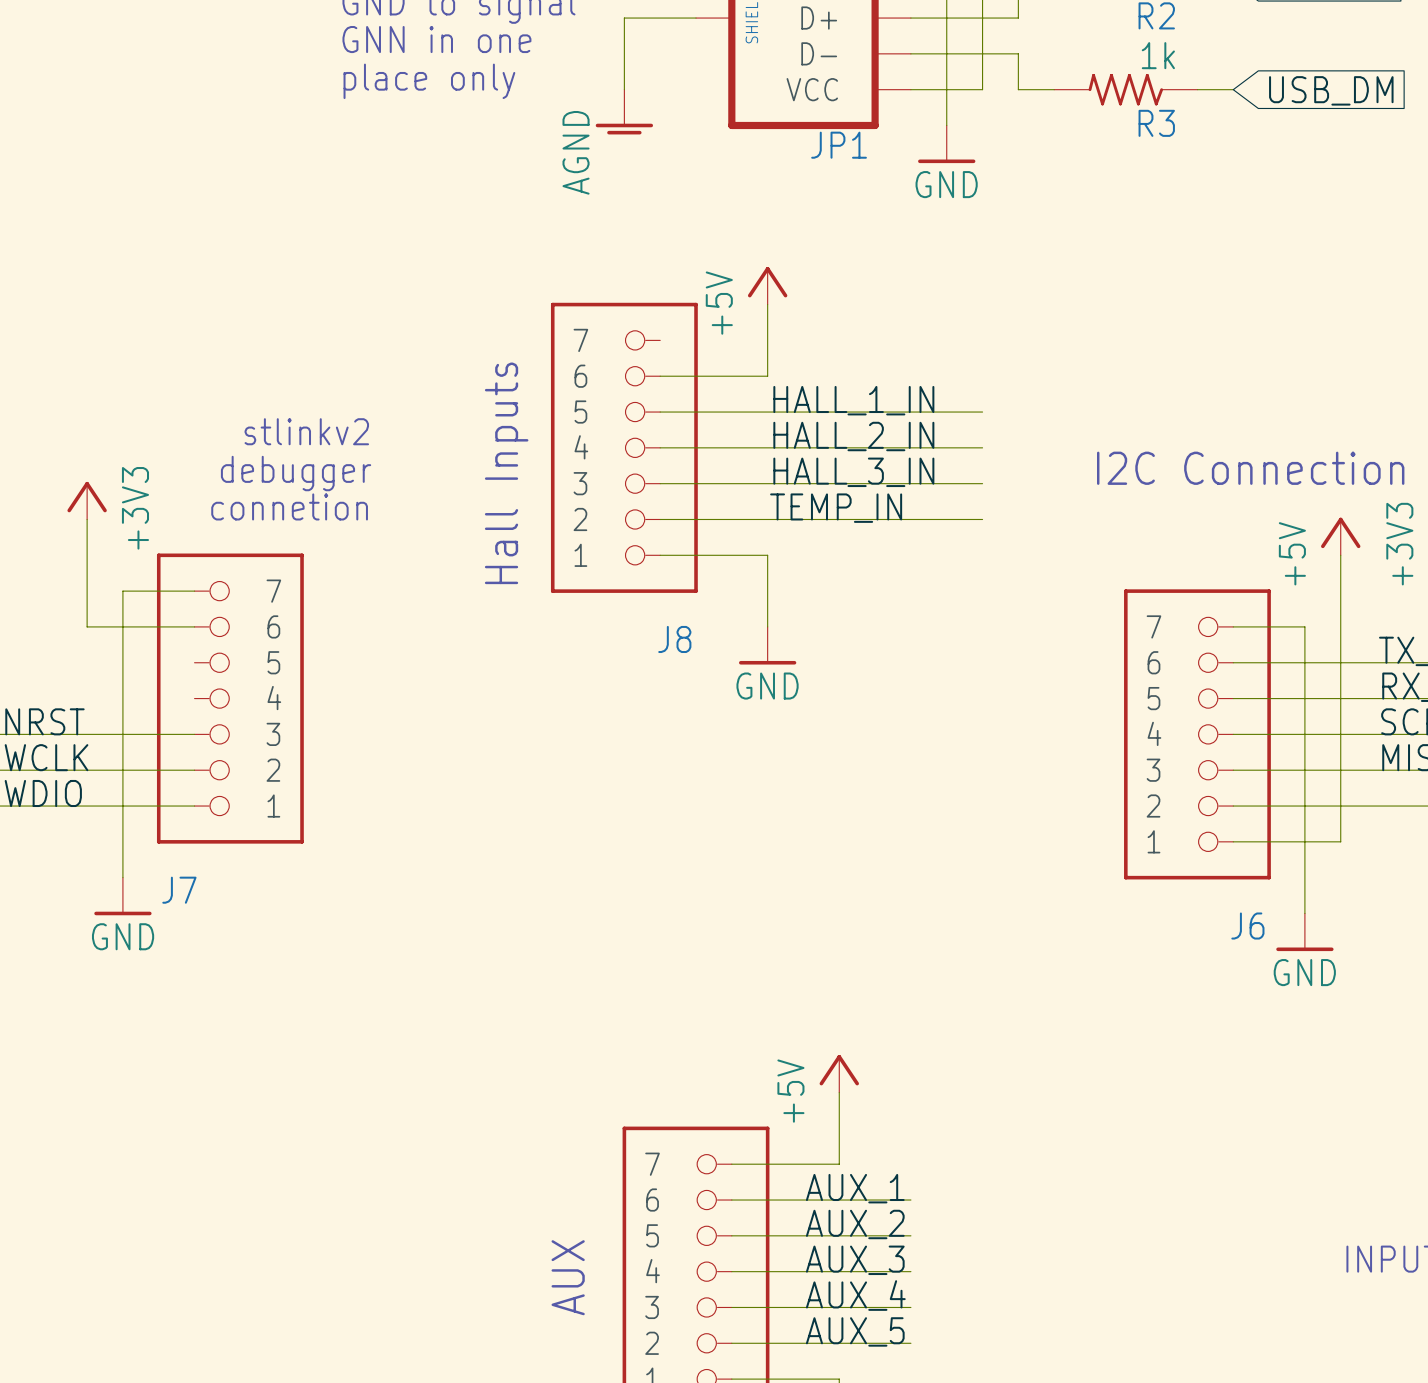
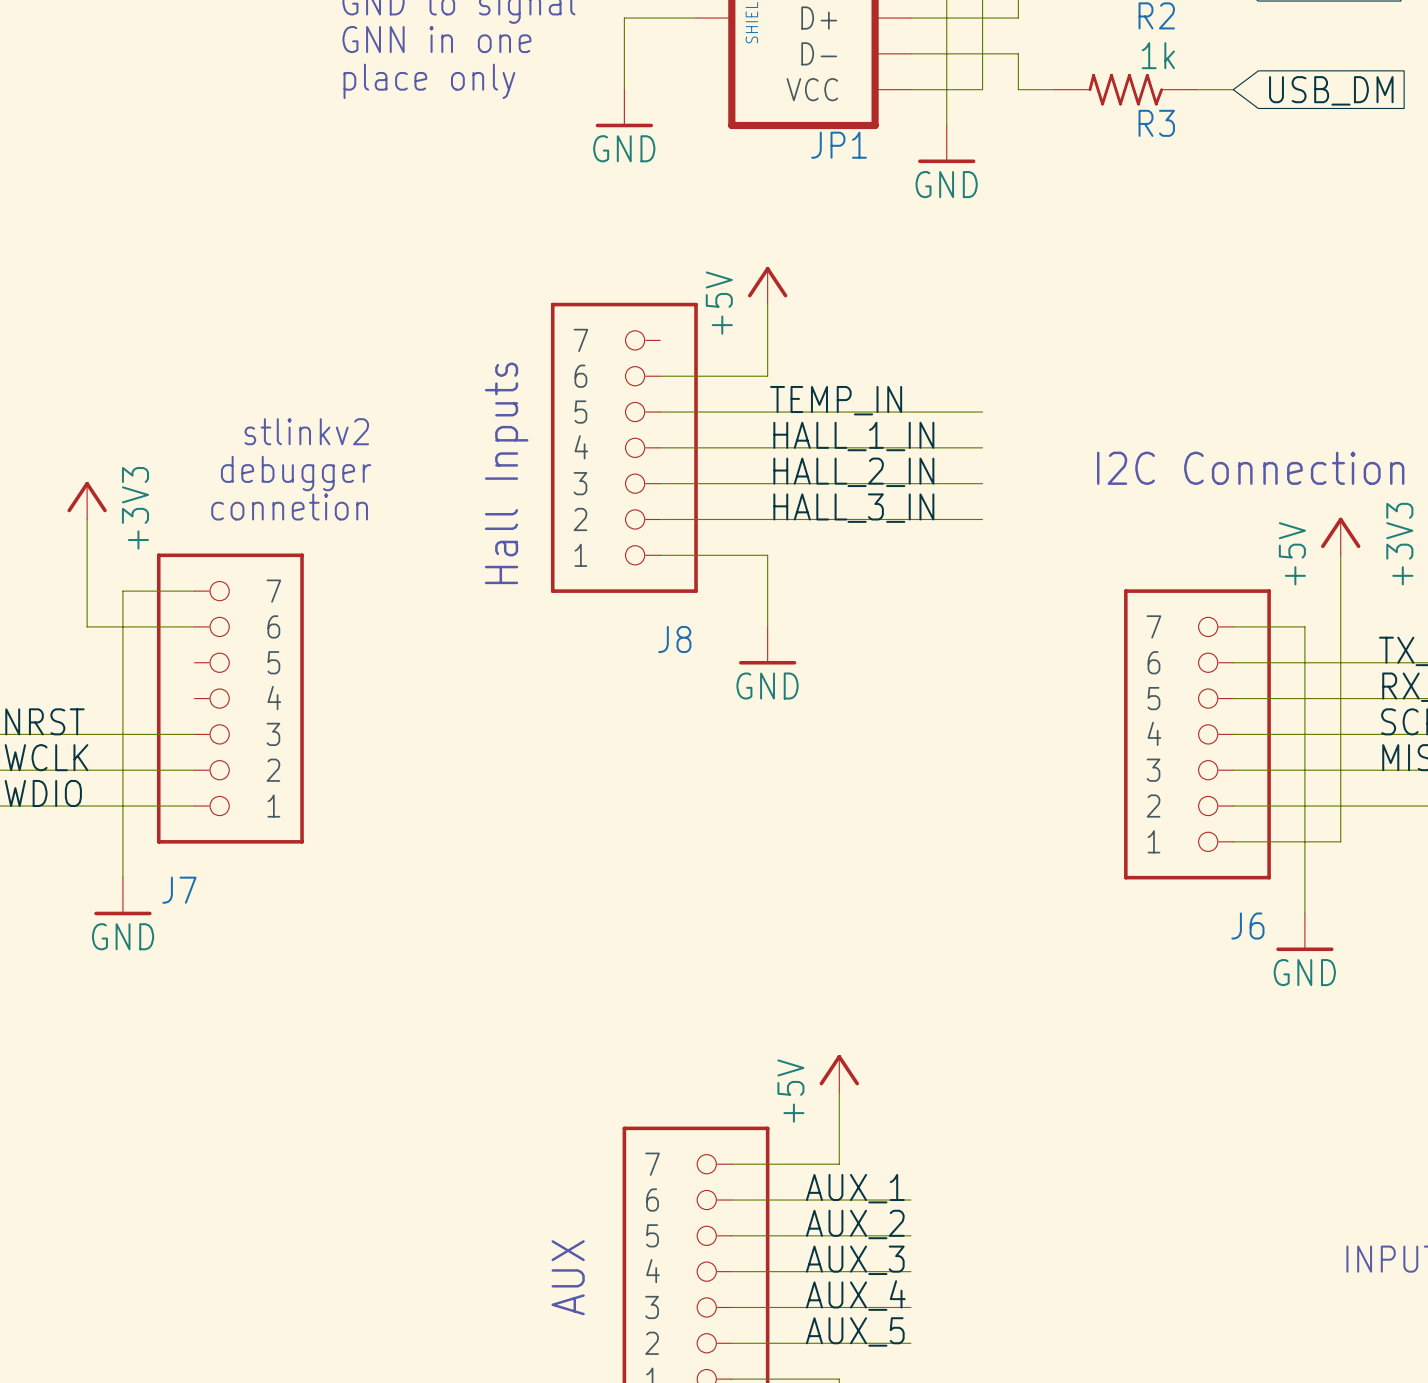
power symbol: AGND (624, 112) -> GND (624, 108)
label: HALL_1_IN (853, 400) -> TEMP_IN (836, 400)
label: HALL_2_IN (853, 436) -> HALL_1_IN (853, 436)
label: HALL_3_IN (853, 472) -> HALL_2_IN (853, 472)
label: TEMP_IN (836, 508) -> HALL_3_IN (853, 508)

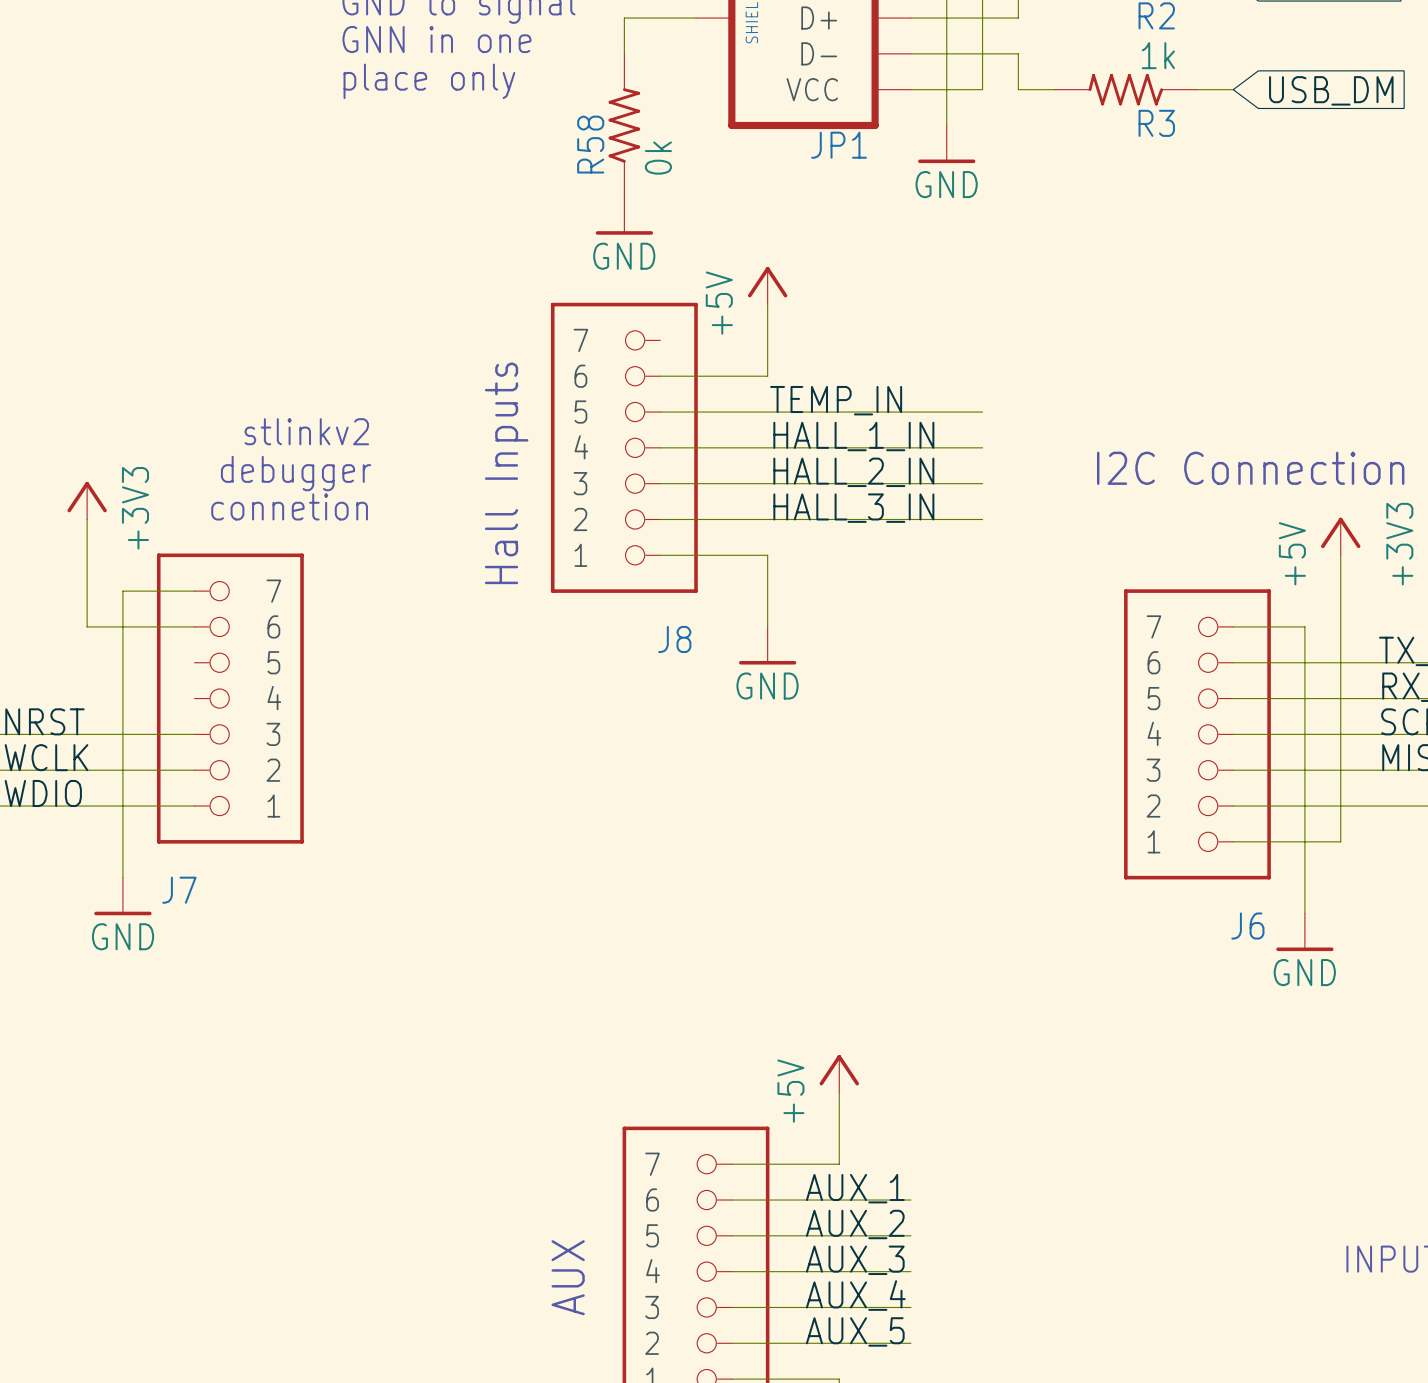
power symbol position: GND (624, 108) -> GND (624, 215)
R58: none -> 0k (624, 125)

